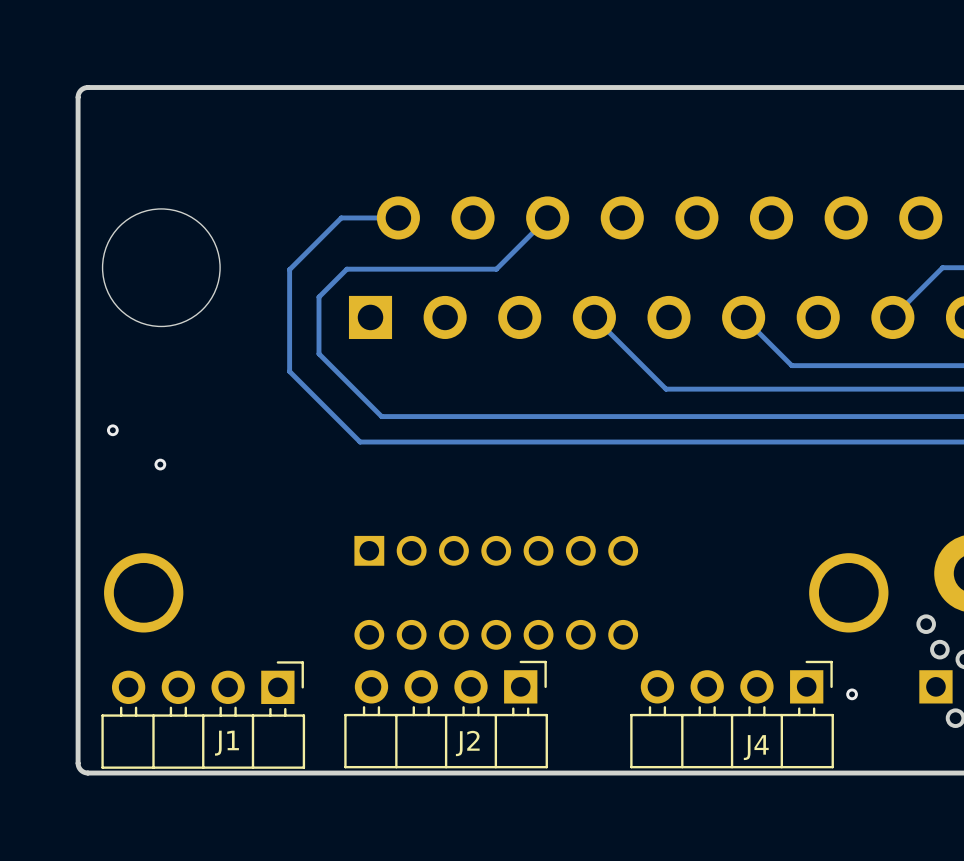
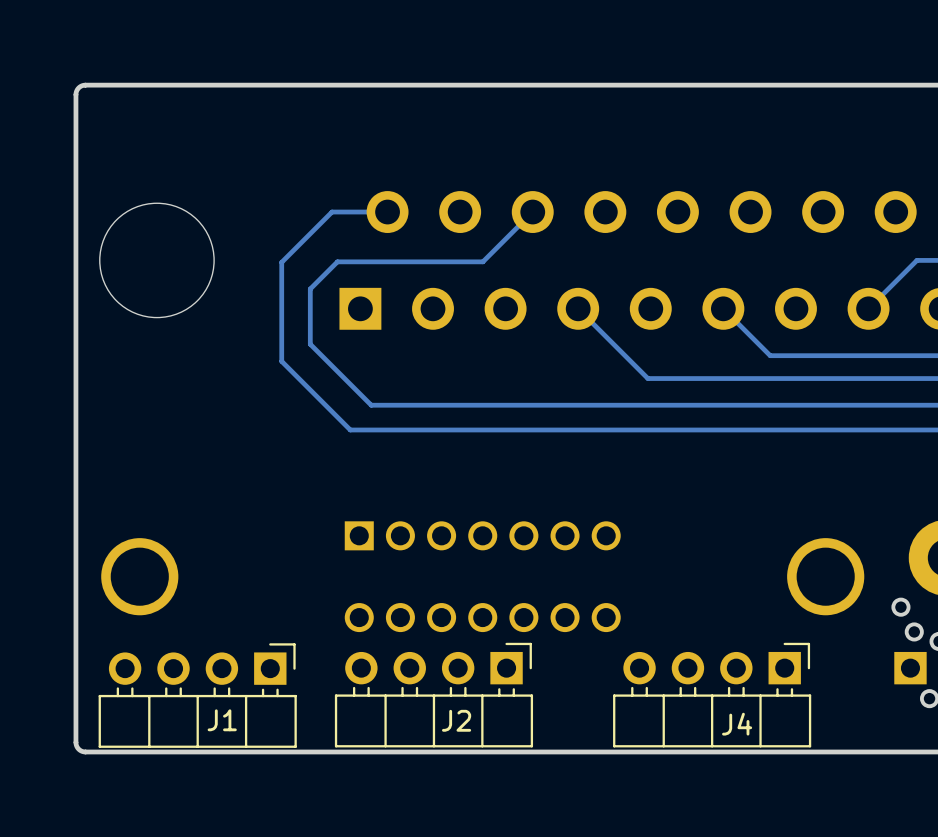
via: (112, 430) -> none
via: (160, 464) -> none
via: (852, 694) -> none

